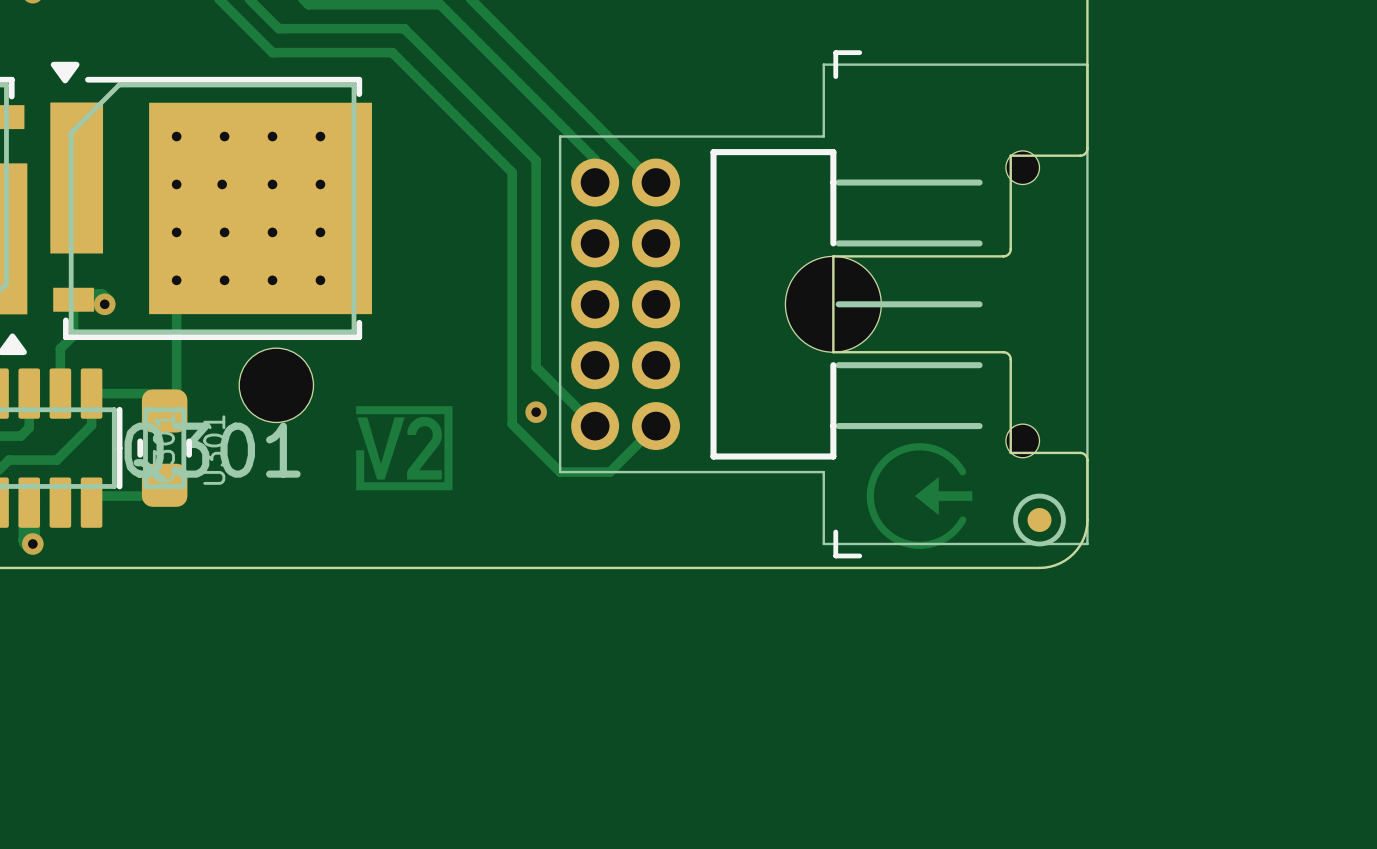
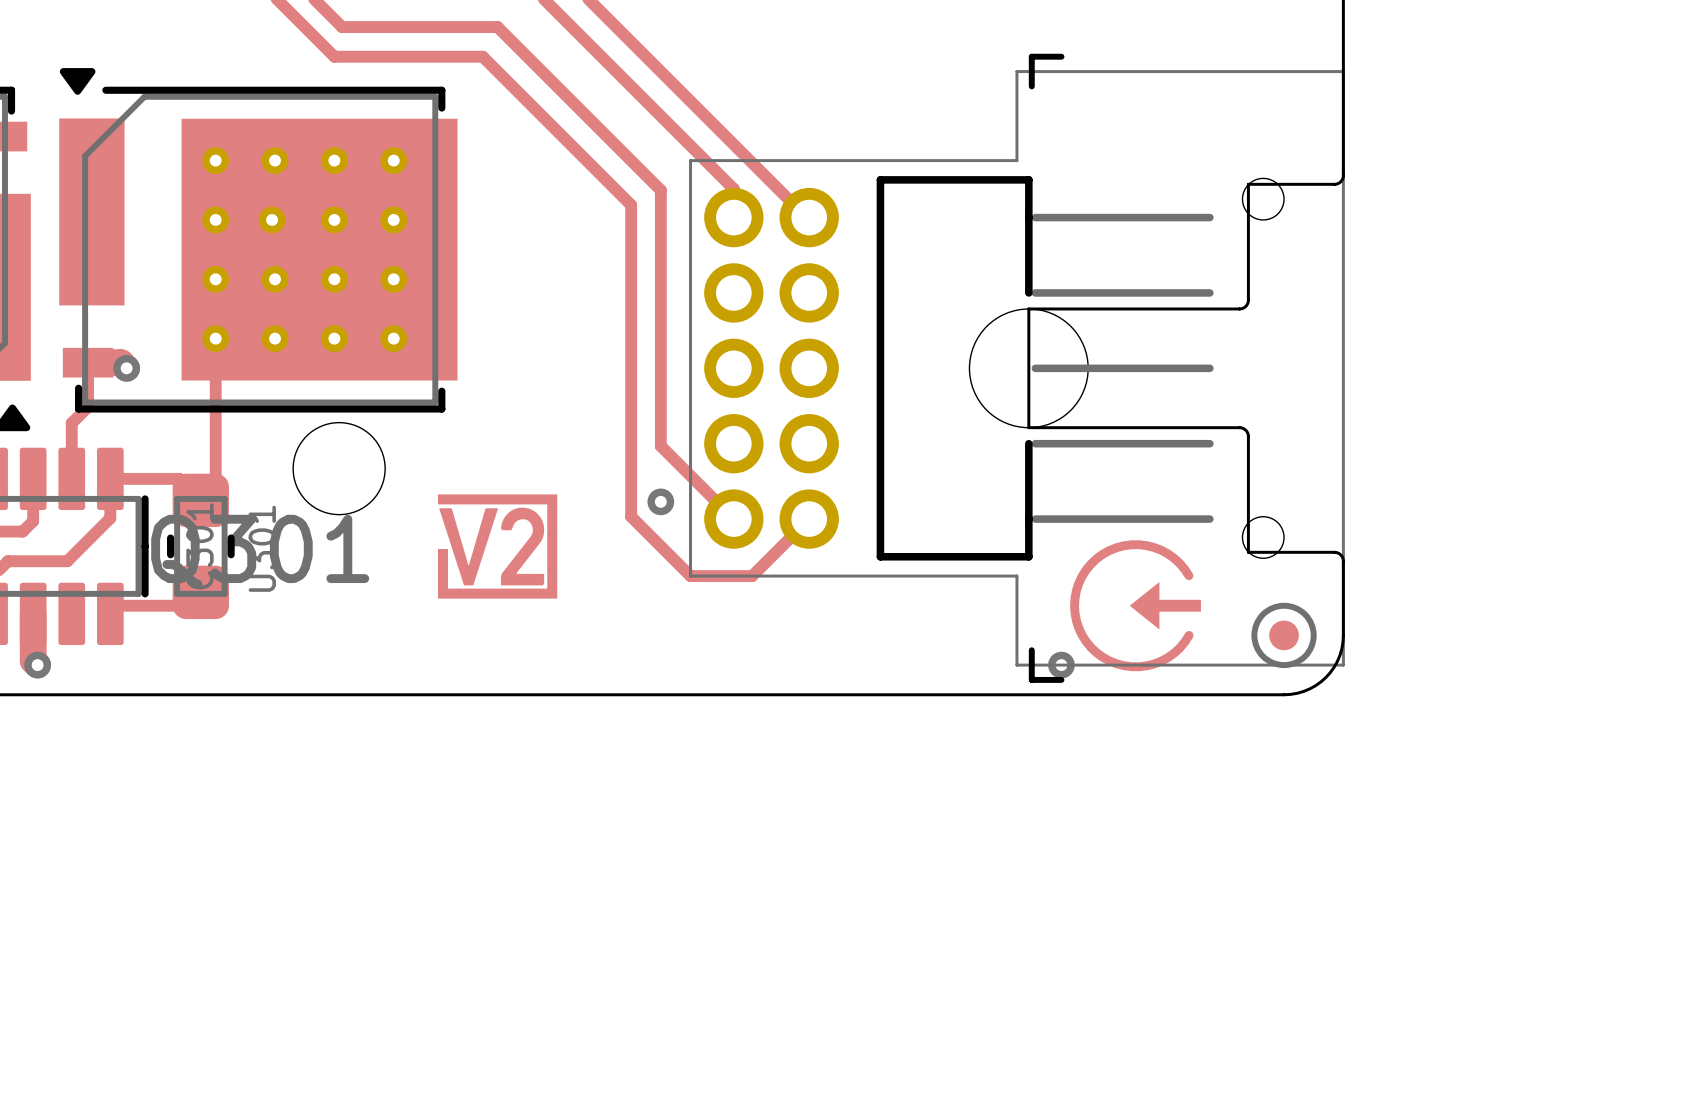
via: none -> (1061, 665)

